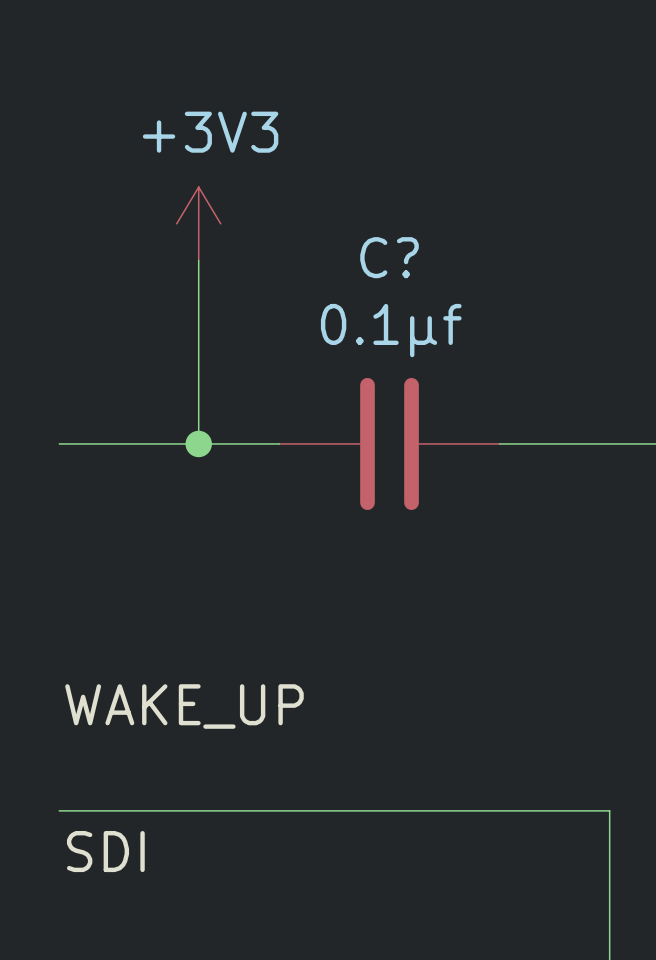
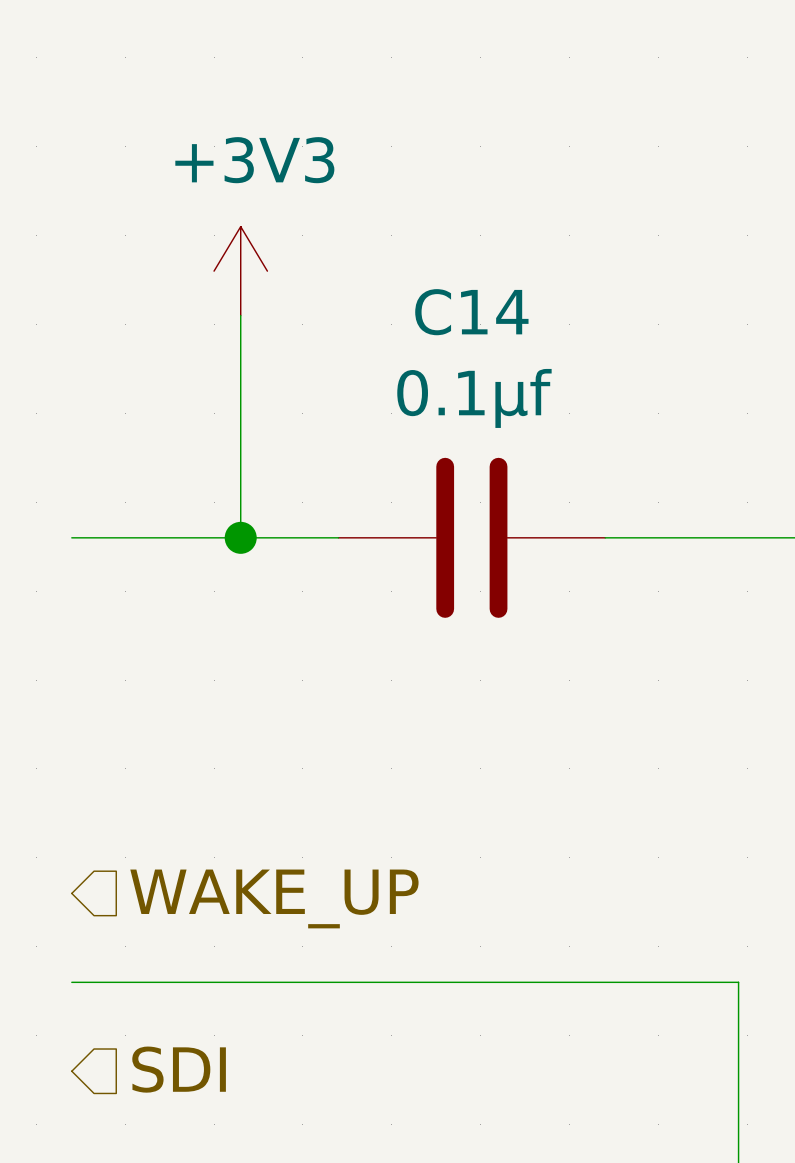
C? name: C? (389, 257) -> C14 (471, 312)
label: WAKE_UP (184, 706) -> none
hierarchical label: none -> WAKE_UP (274, 898)
label: SDI (105, 851) -> none
hierarchical label: none -> SDI (179, 1069)

